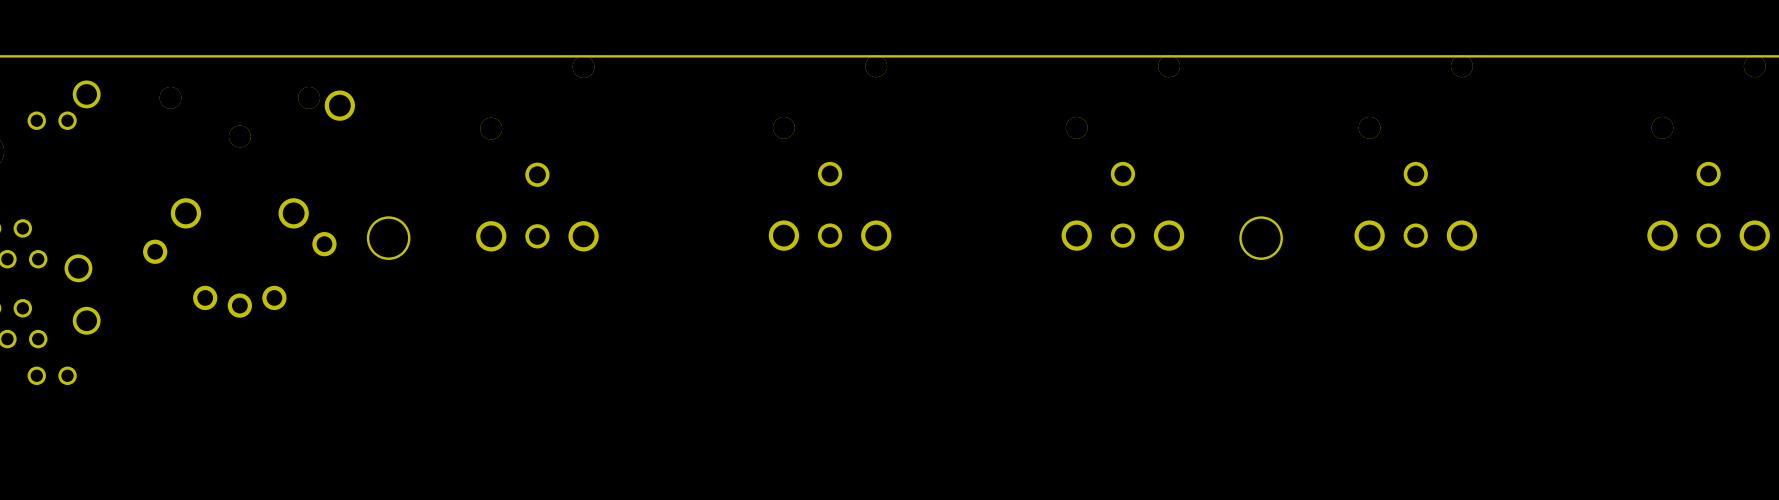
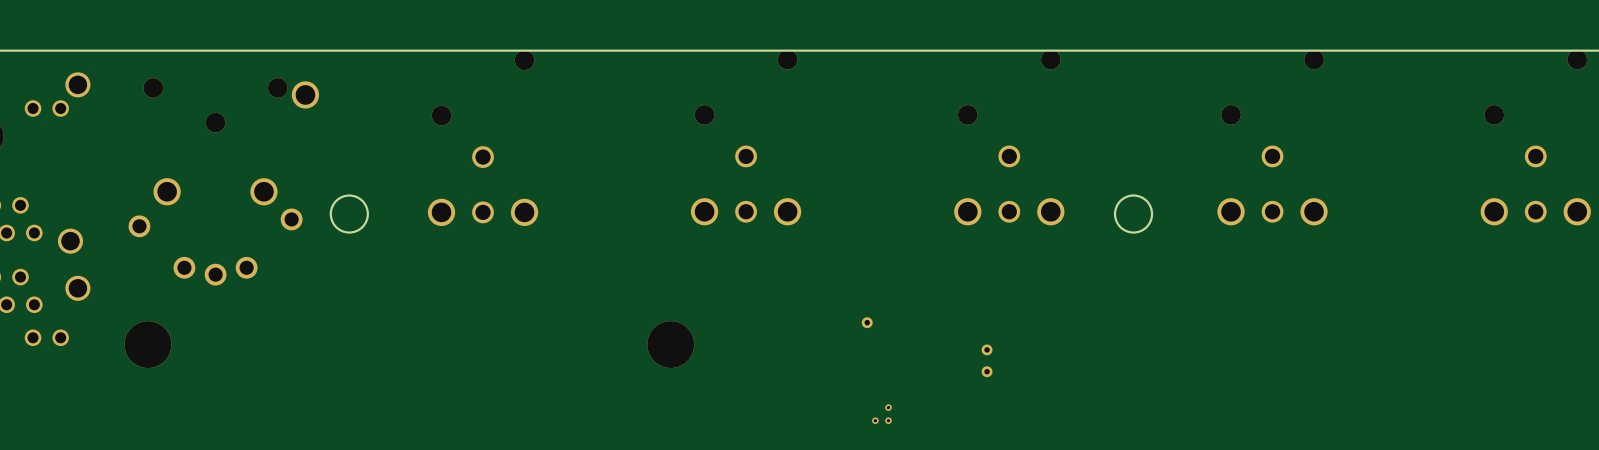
part: none -> (867, 322)
part: none -> (147, 344)
part: none -> (670, 344)
part: none -> (987, 349)
part: none -> (987, 371)
part: none -> (881, 414)

